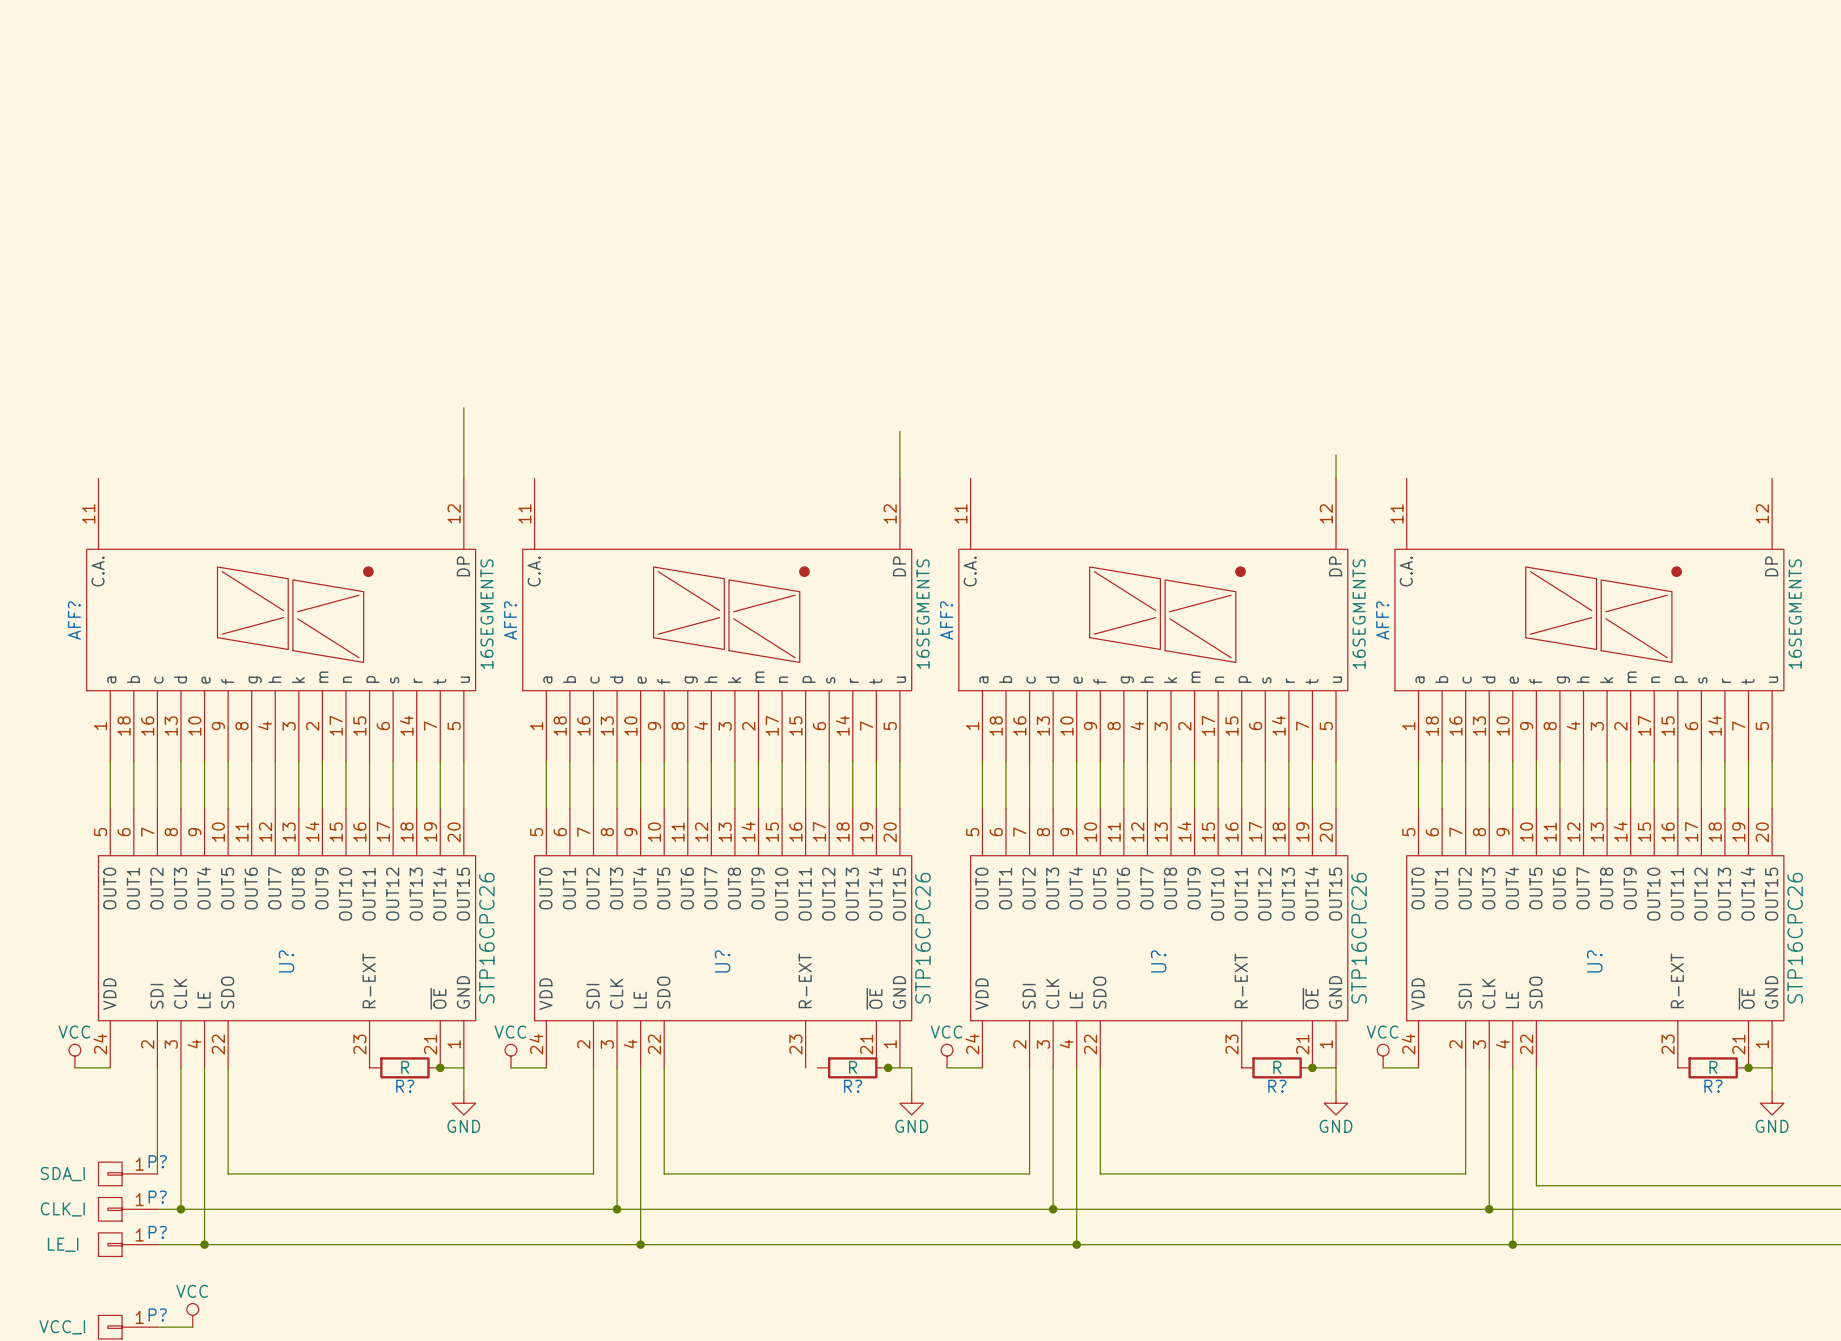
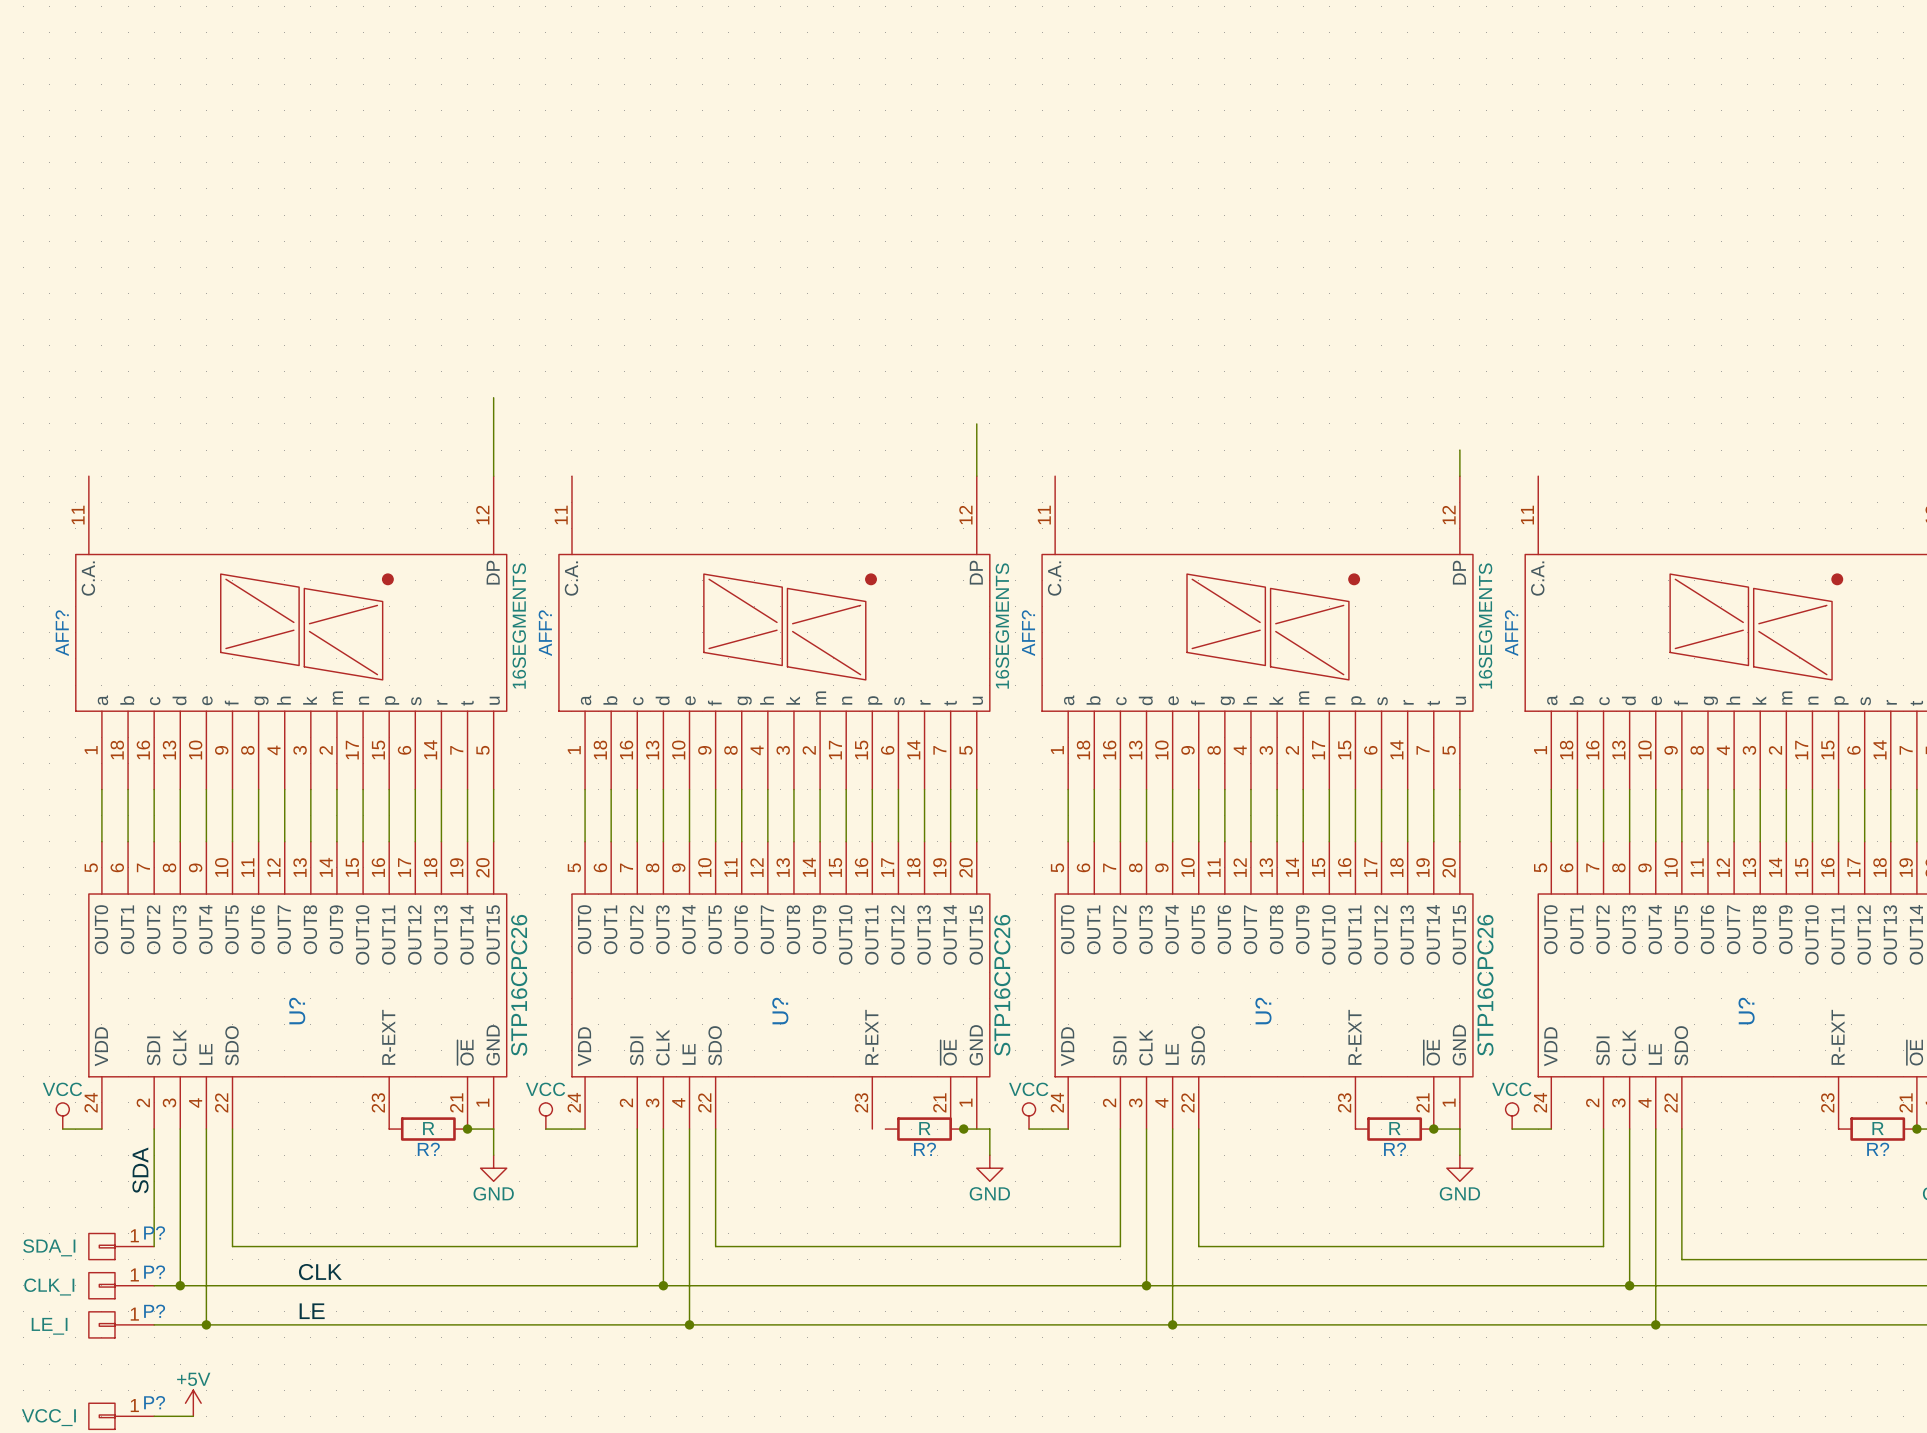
label: none -> SDA (140, 1170)
label: none -> CLK (320, 1272)
label: none -> LE (312, 1311)
power symbol: VCC (192, 1315) -> +5V (193, 1403)

